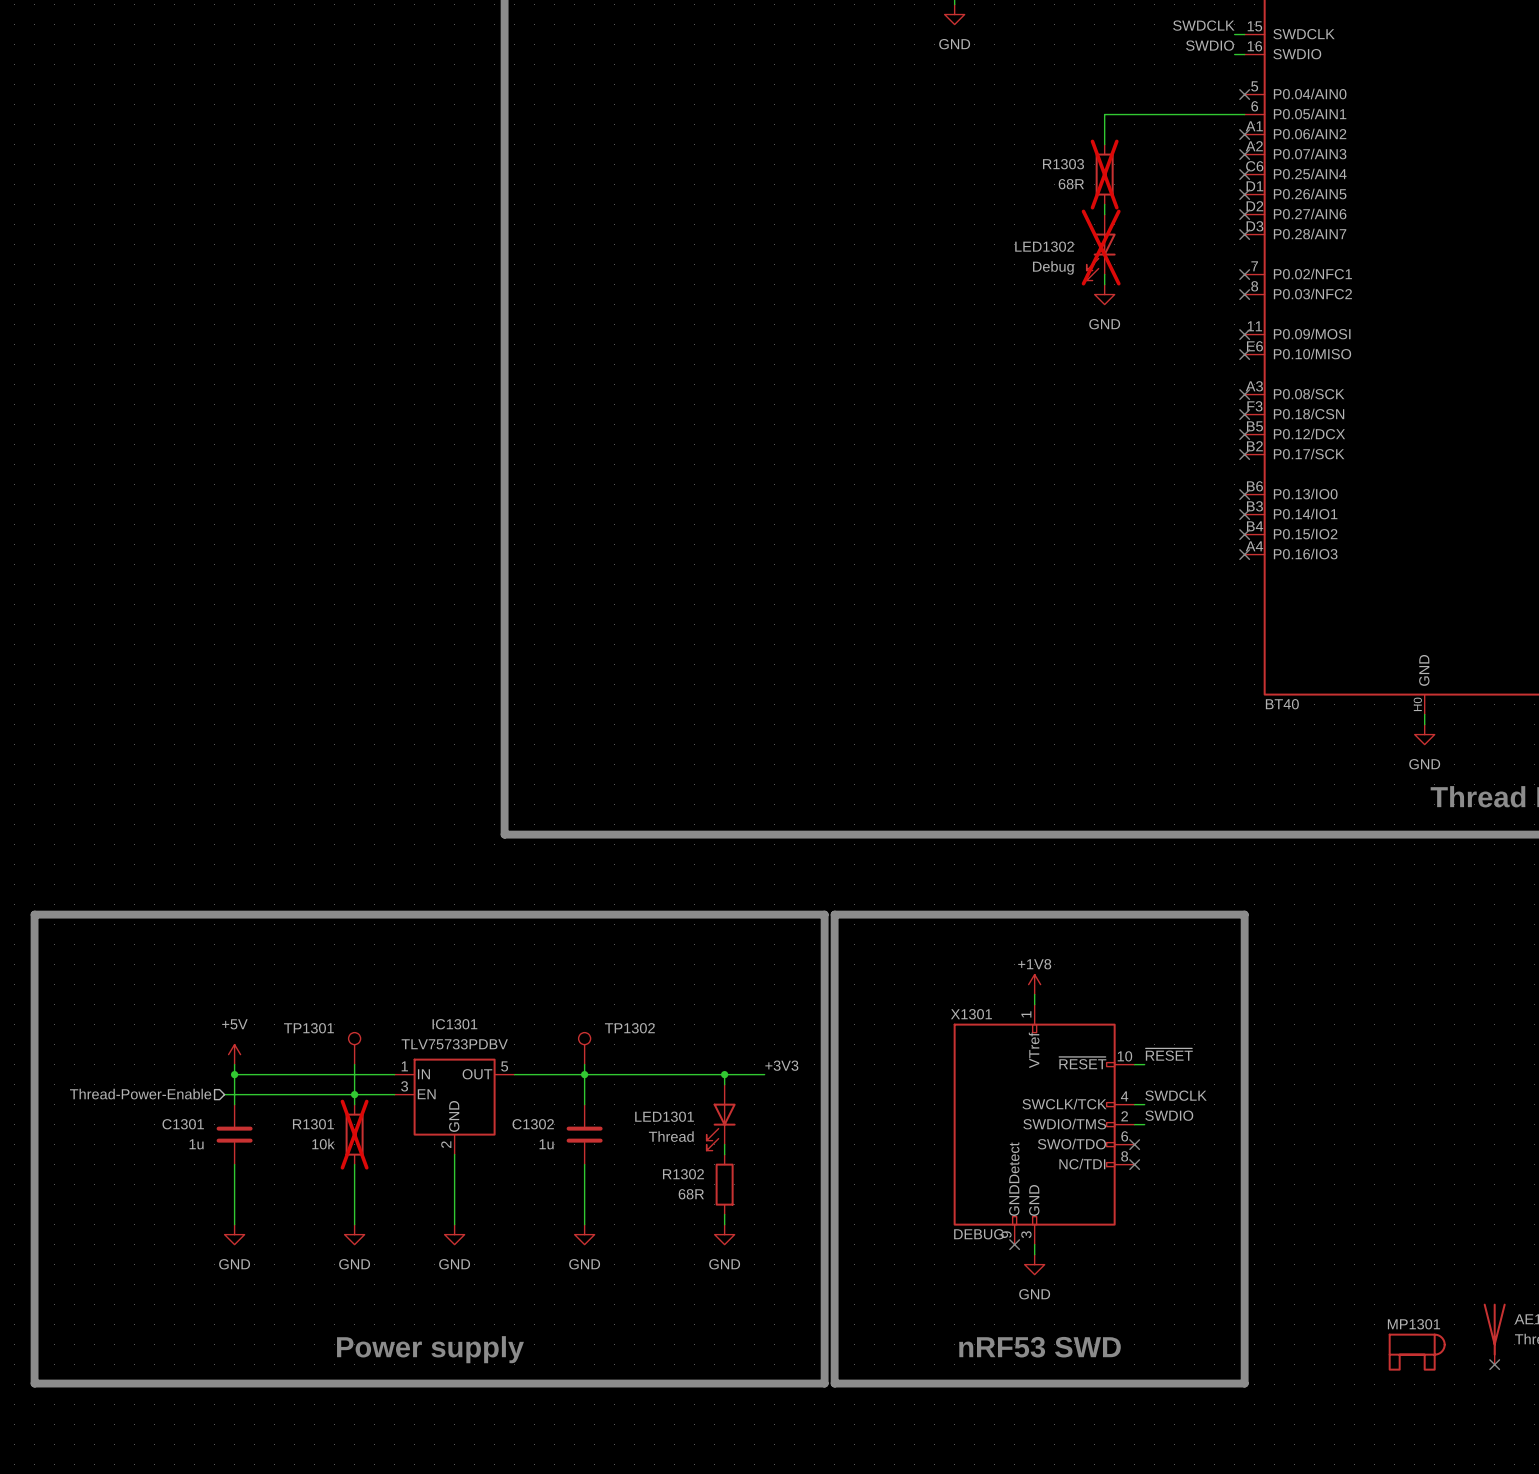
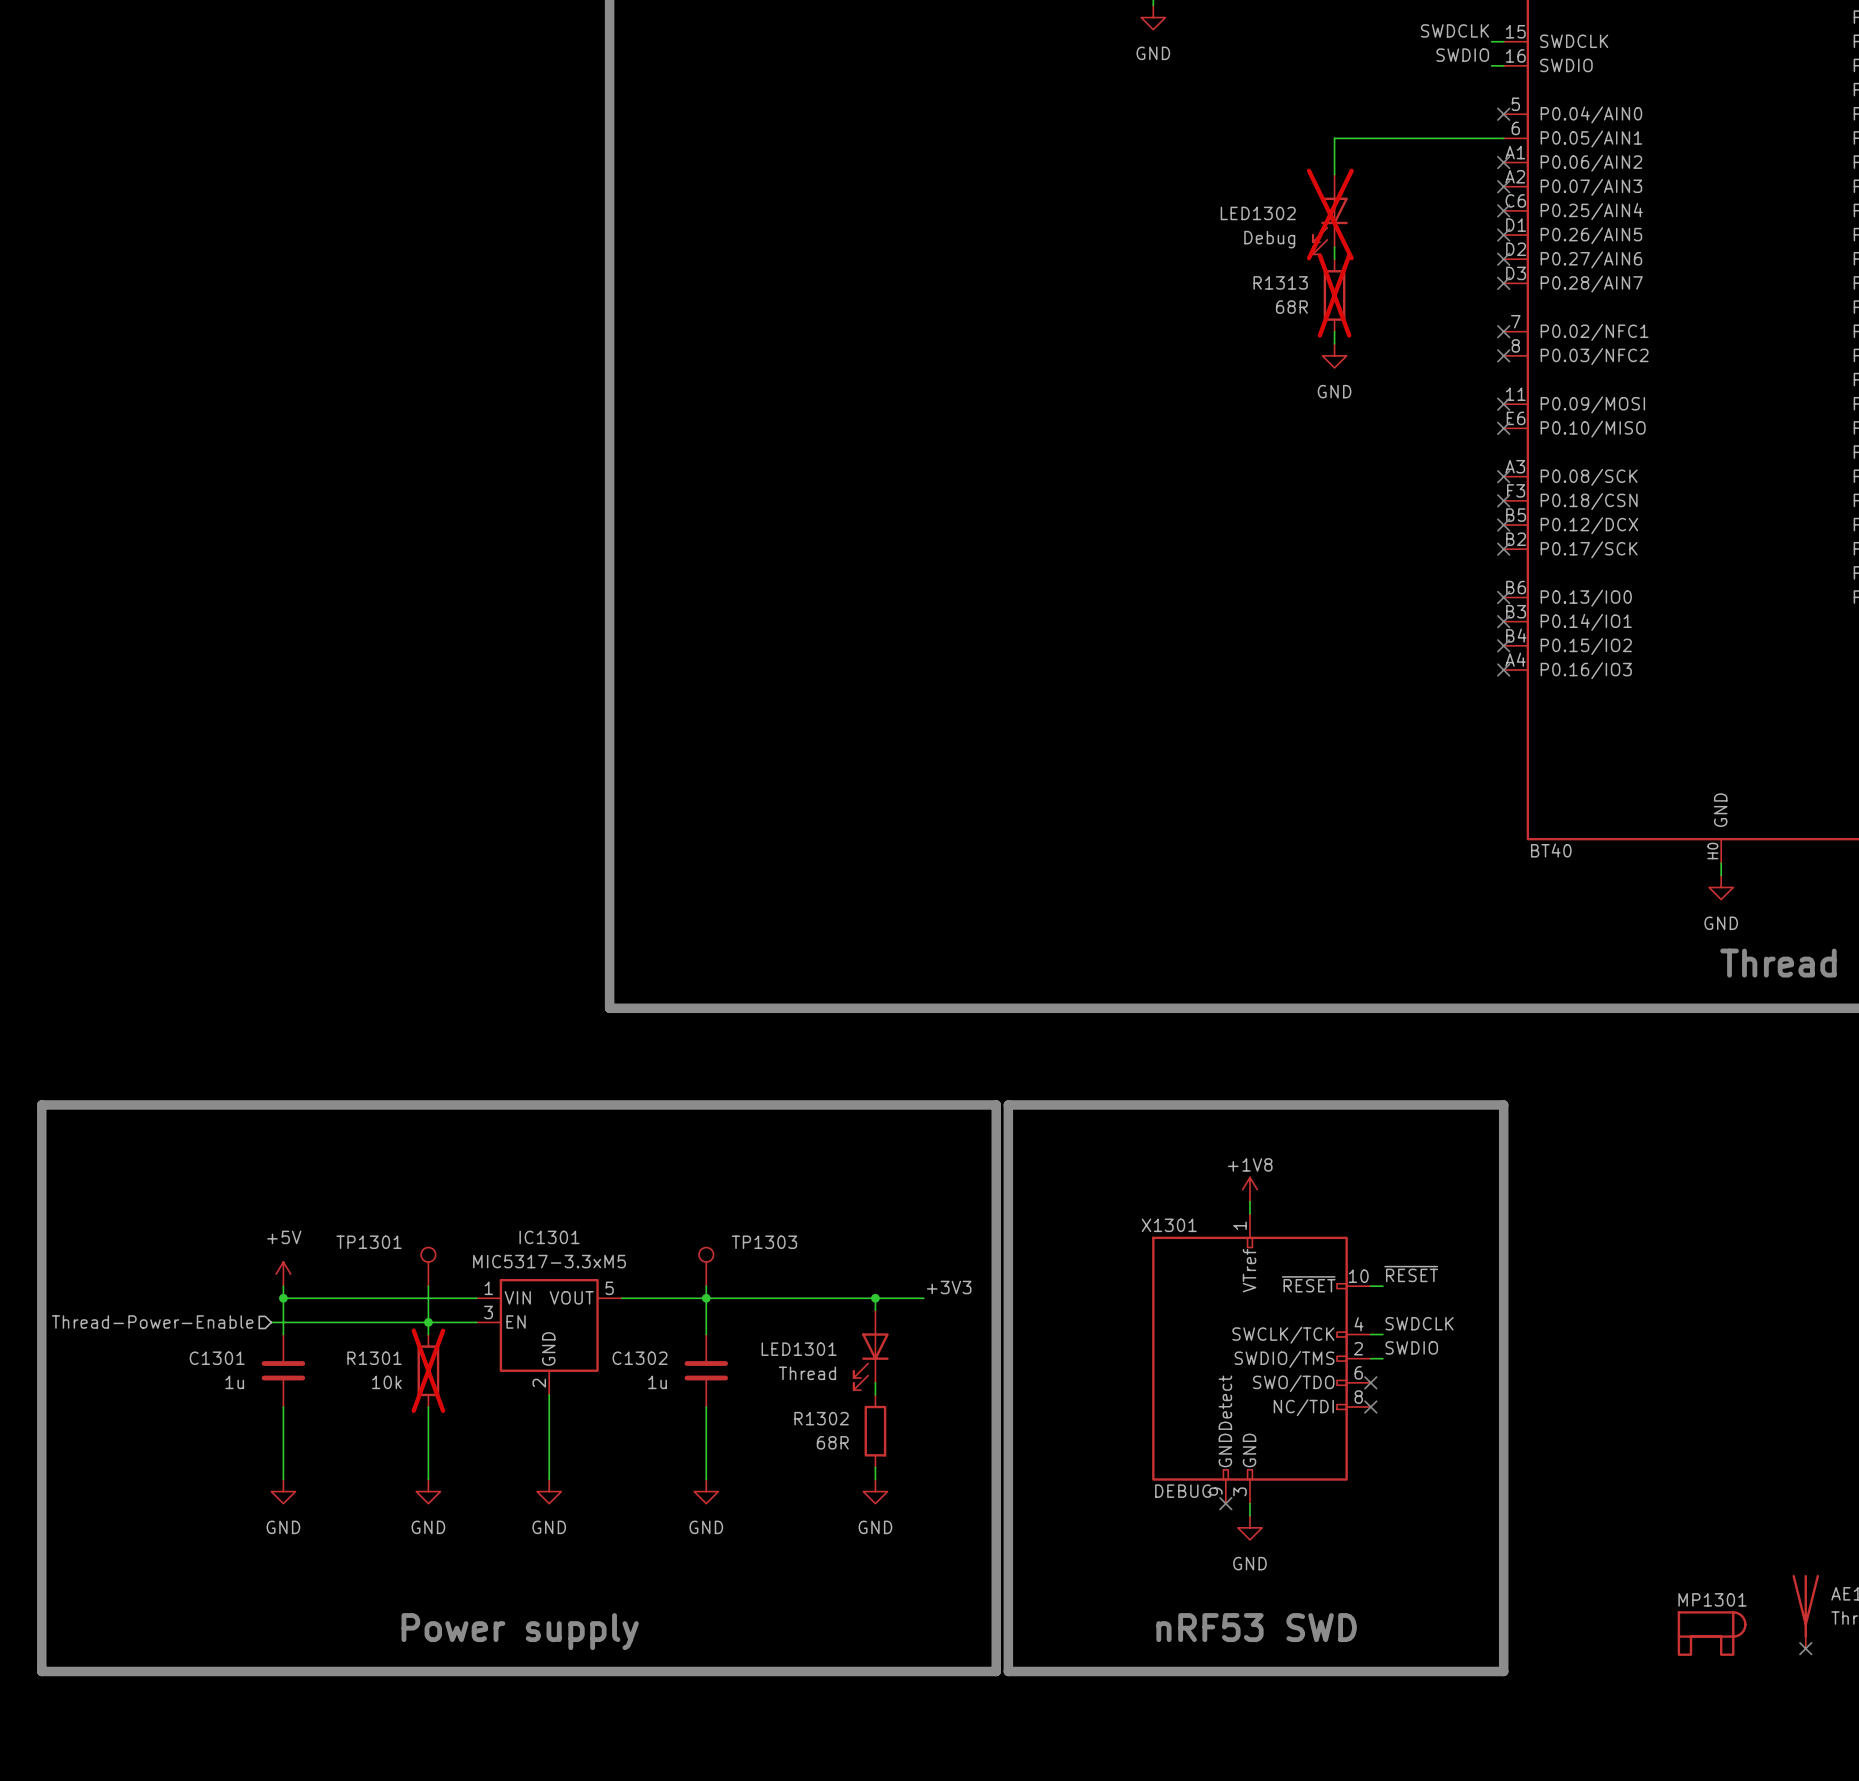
R1303: 68R (1104, 174) -> none
R1313: none -> 68R (1334, 295)
LED1302 position: (1101, 247) -> (1330, 214)
TP1302 name: TP1302 (629, 1028) -> TP1303 (764, 1242)
IC1301 value: TLV75733PDBV (454, 1044) -> MIC5317-3.3xM5 (549, 1261)
IC1301 pin name: IN (423, 1074) -> VIN (517, 1297)
IC1301 pin name: OUT (477, 1074) -> VOUT (571, 1297)

